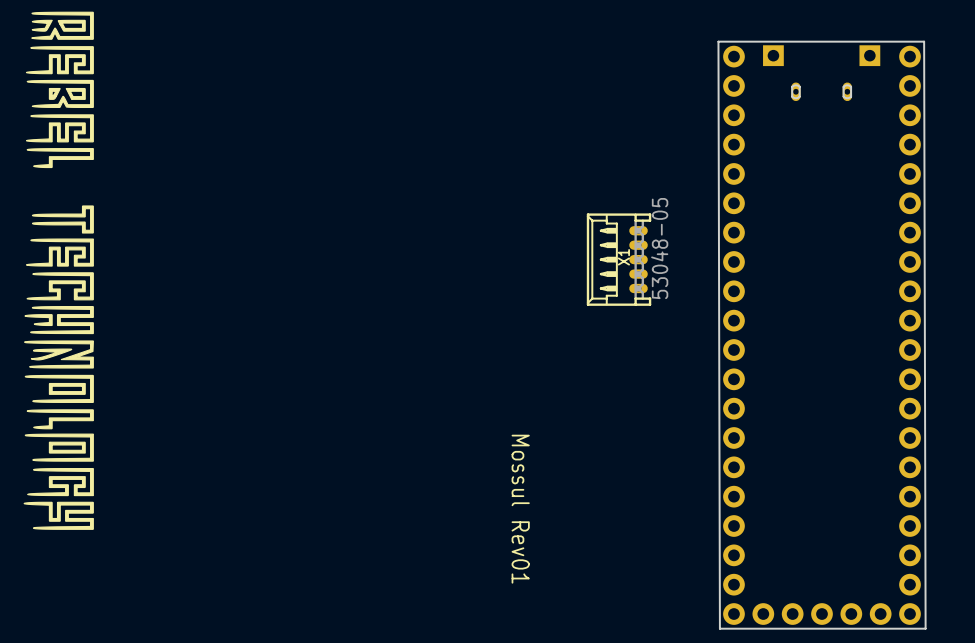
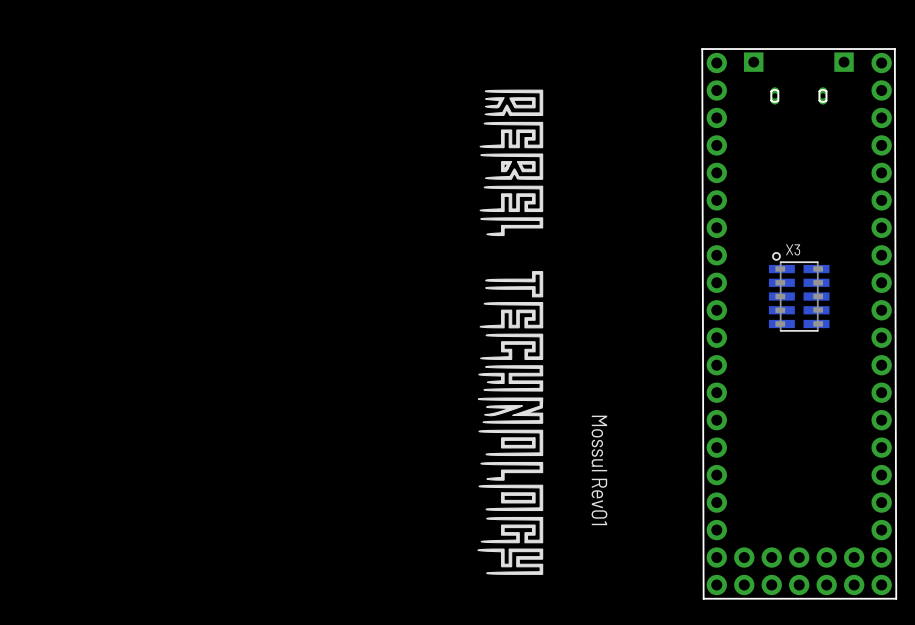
drawing: [25, 11, 94, 169] -> none
drawing: none -> [479, 89, 544, 237]
drawing: [23, 205, 94, 530] -> none
X1: 53048-05 (619, 259) -> none
drawing: none -> [477, 271, 544, 575]
X3: none -> (799, 291)
text position: Mossul Rev01 (520, 509) -> Mossul Rev01 (599, 470)
part: none -> (799, 557)

